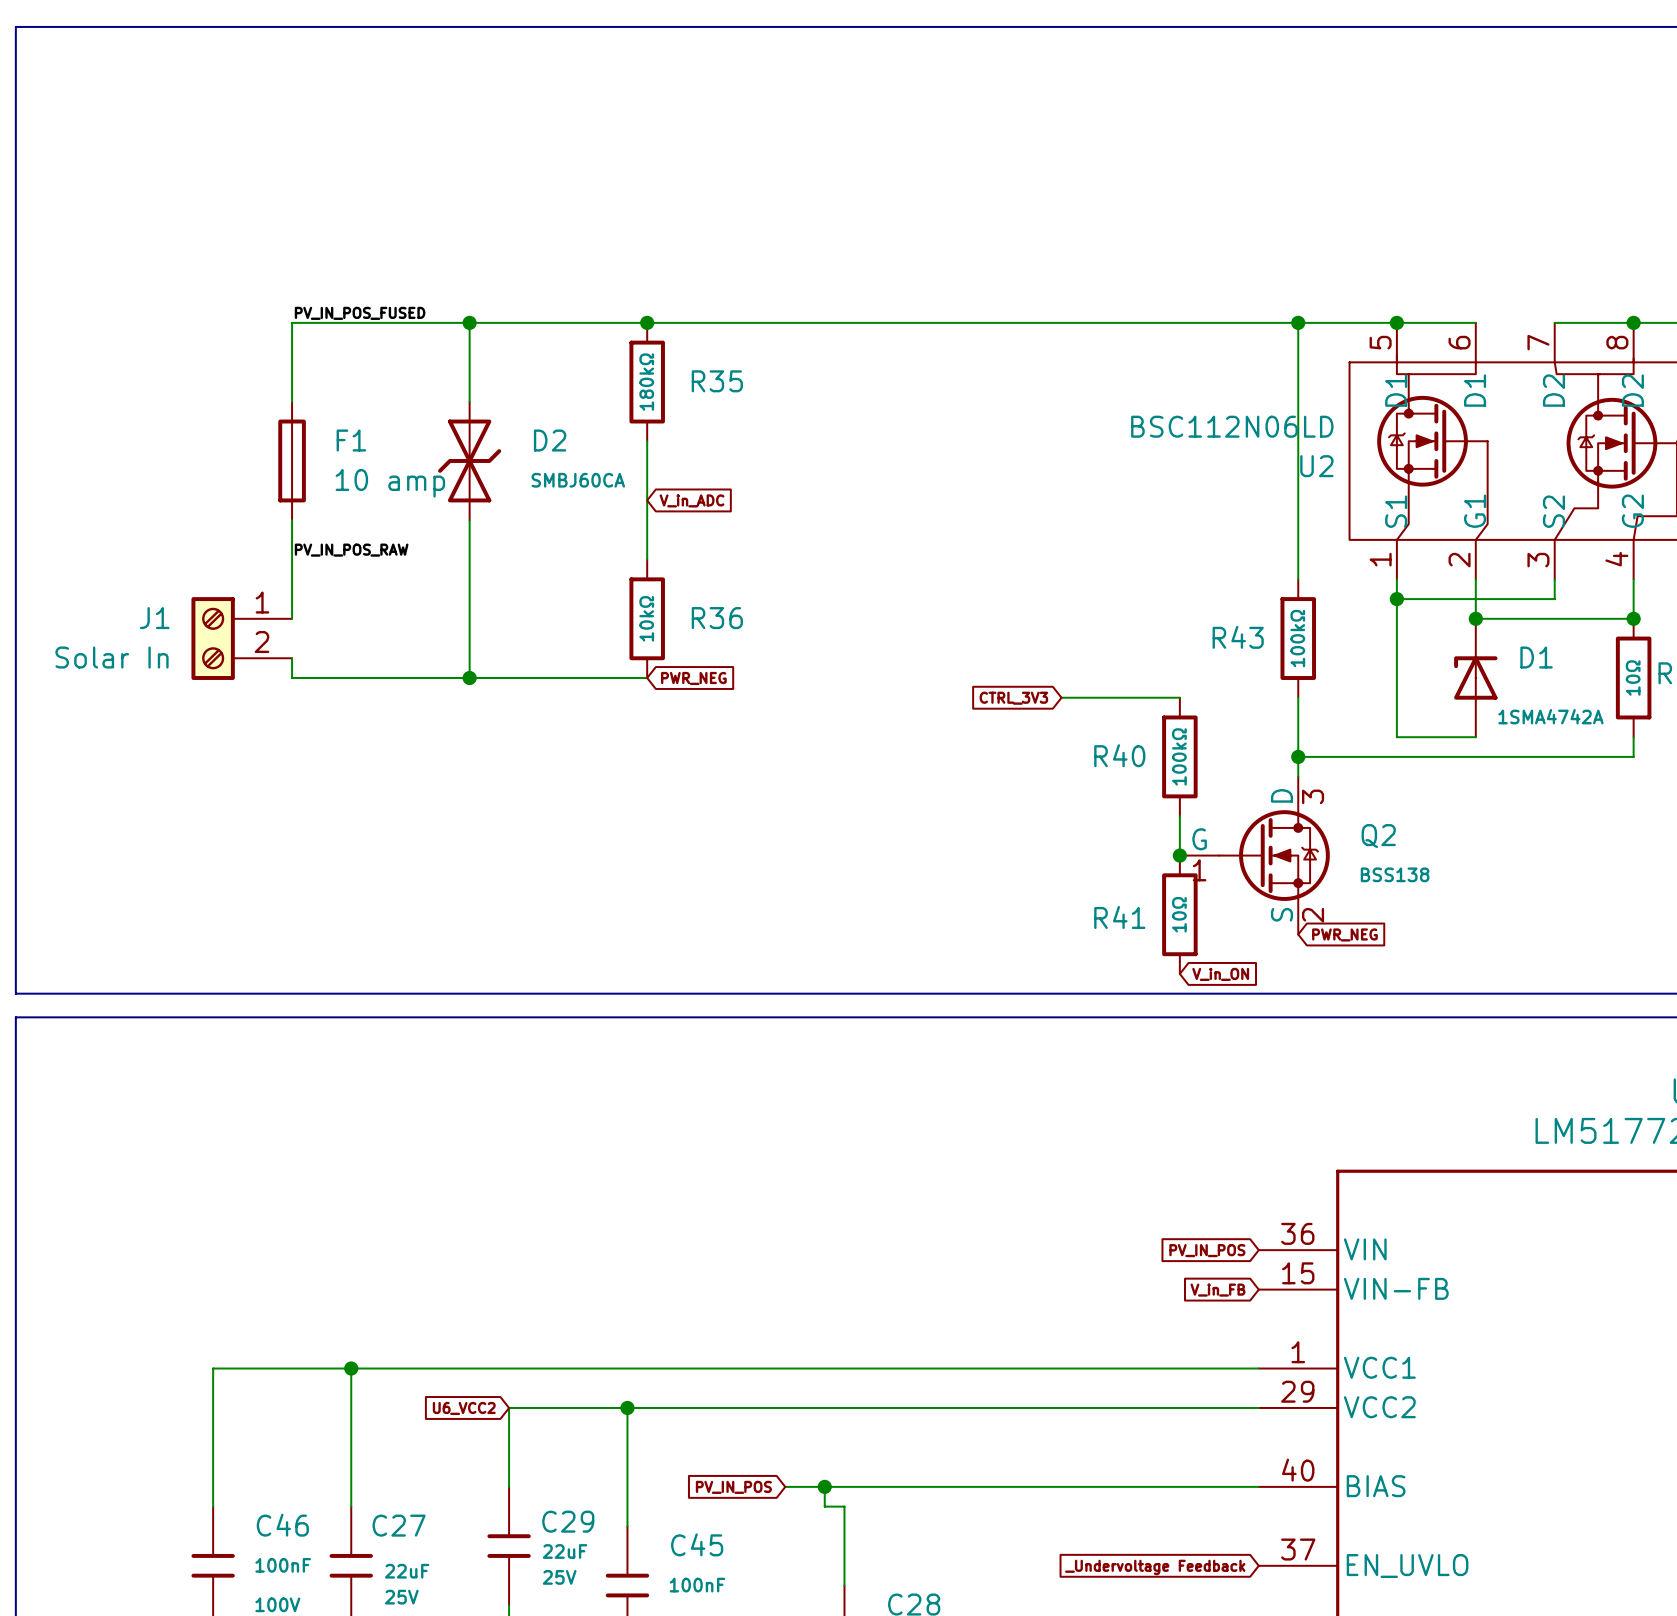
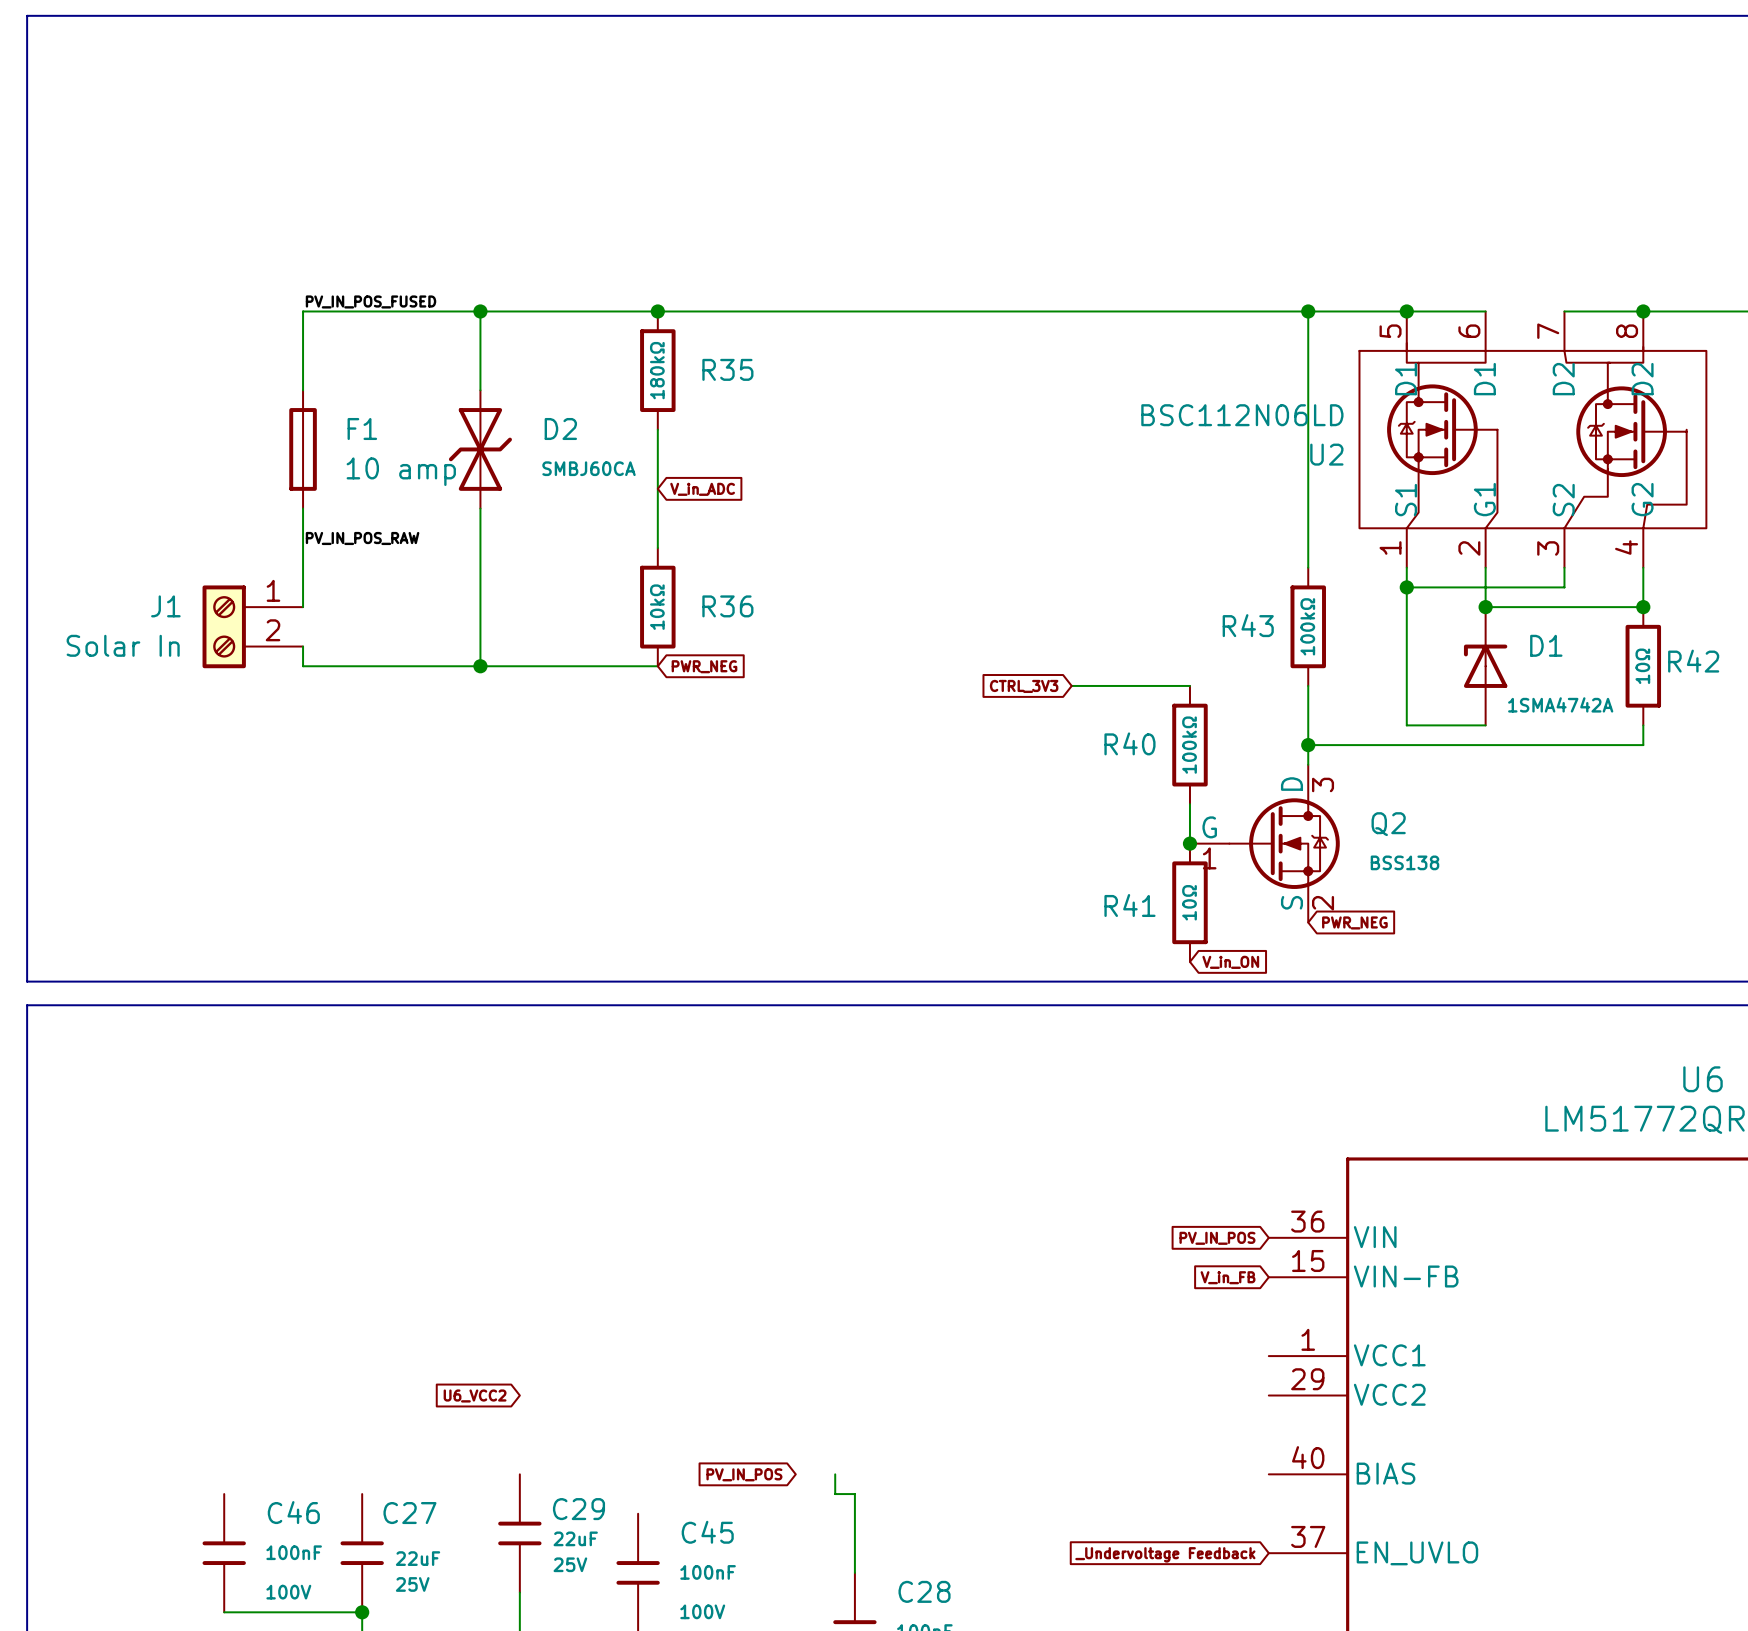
wire: (351, 1368) (351, 1506) -> none
junction: (351, 1368) -> none
wire: (1258, 1368) (213, 1368) (213, 1506) -> none
wire: (627, 1407) (627, 1526) -> none
junction: (627, 1407) -> none
wire: (1258, 1407) (509, 1407) (509, 1486) -> none
wire: (785, 1486) (1258, 1486) -> none
junction: (824, 1486) -> none

